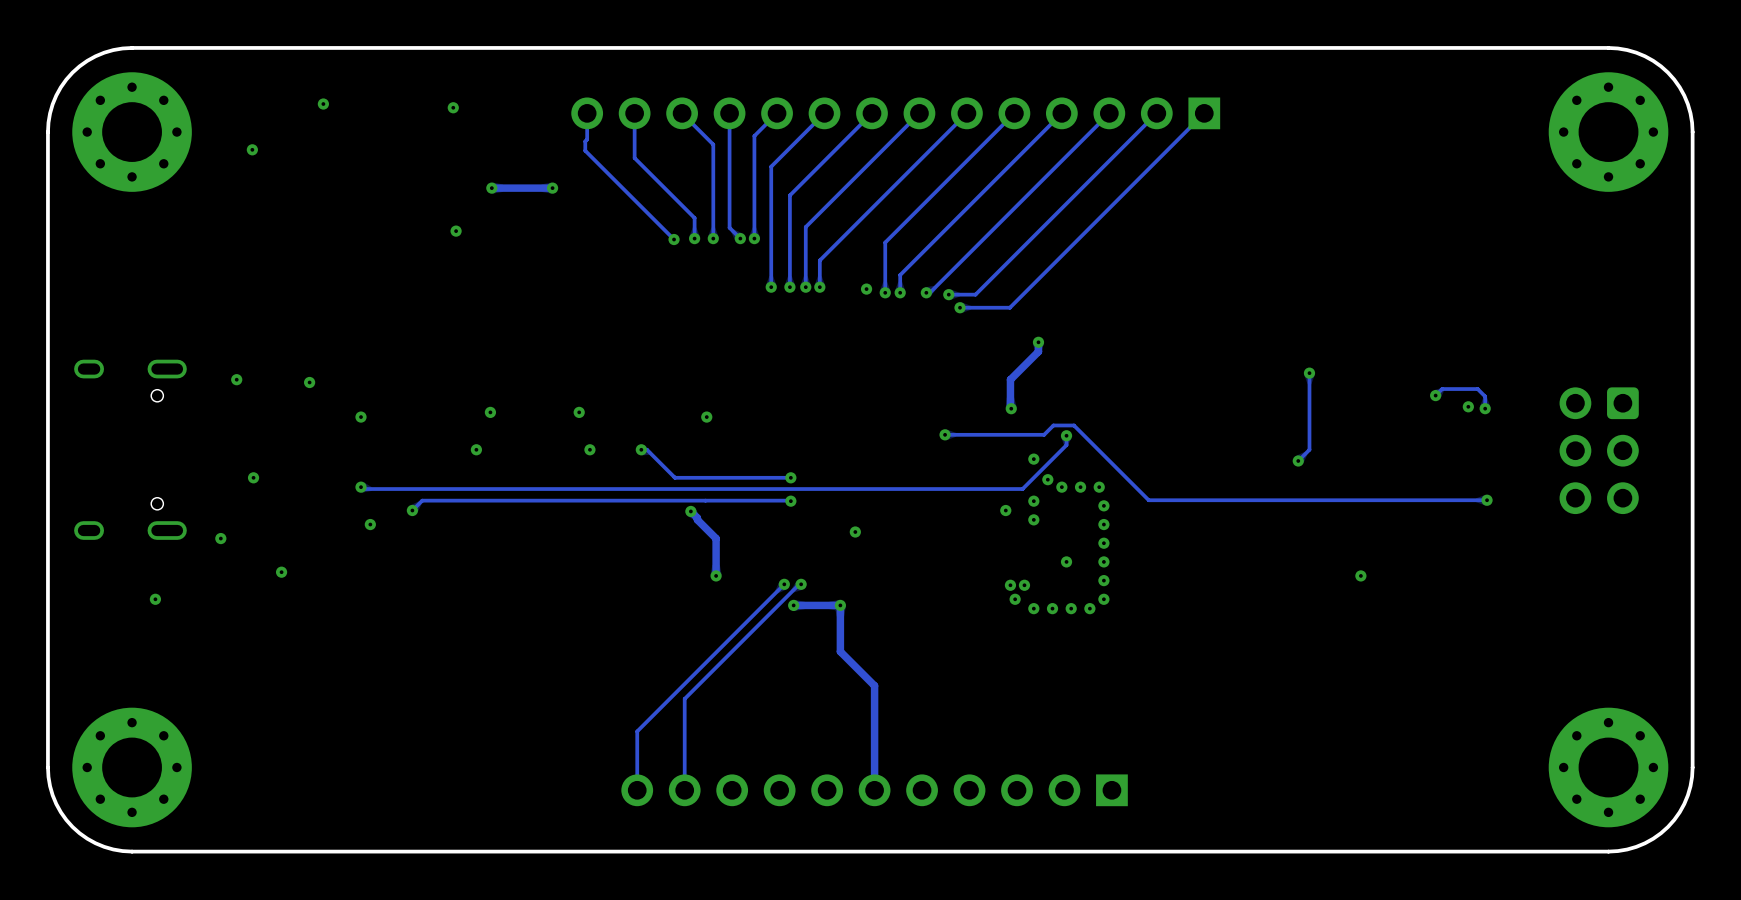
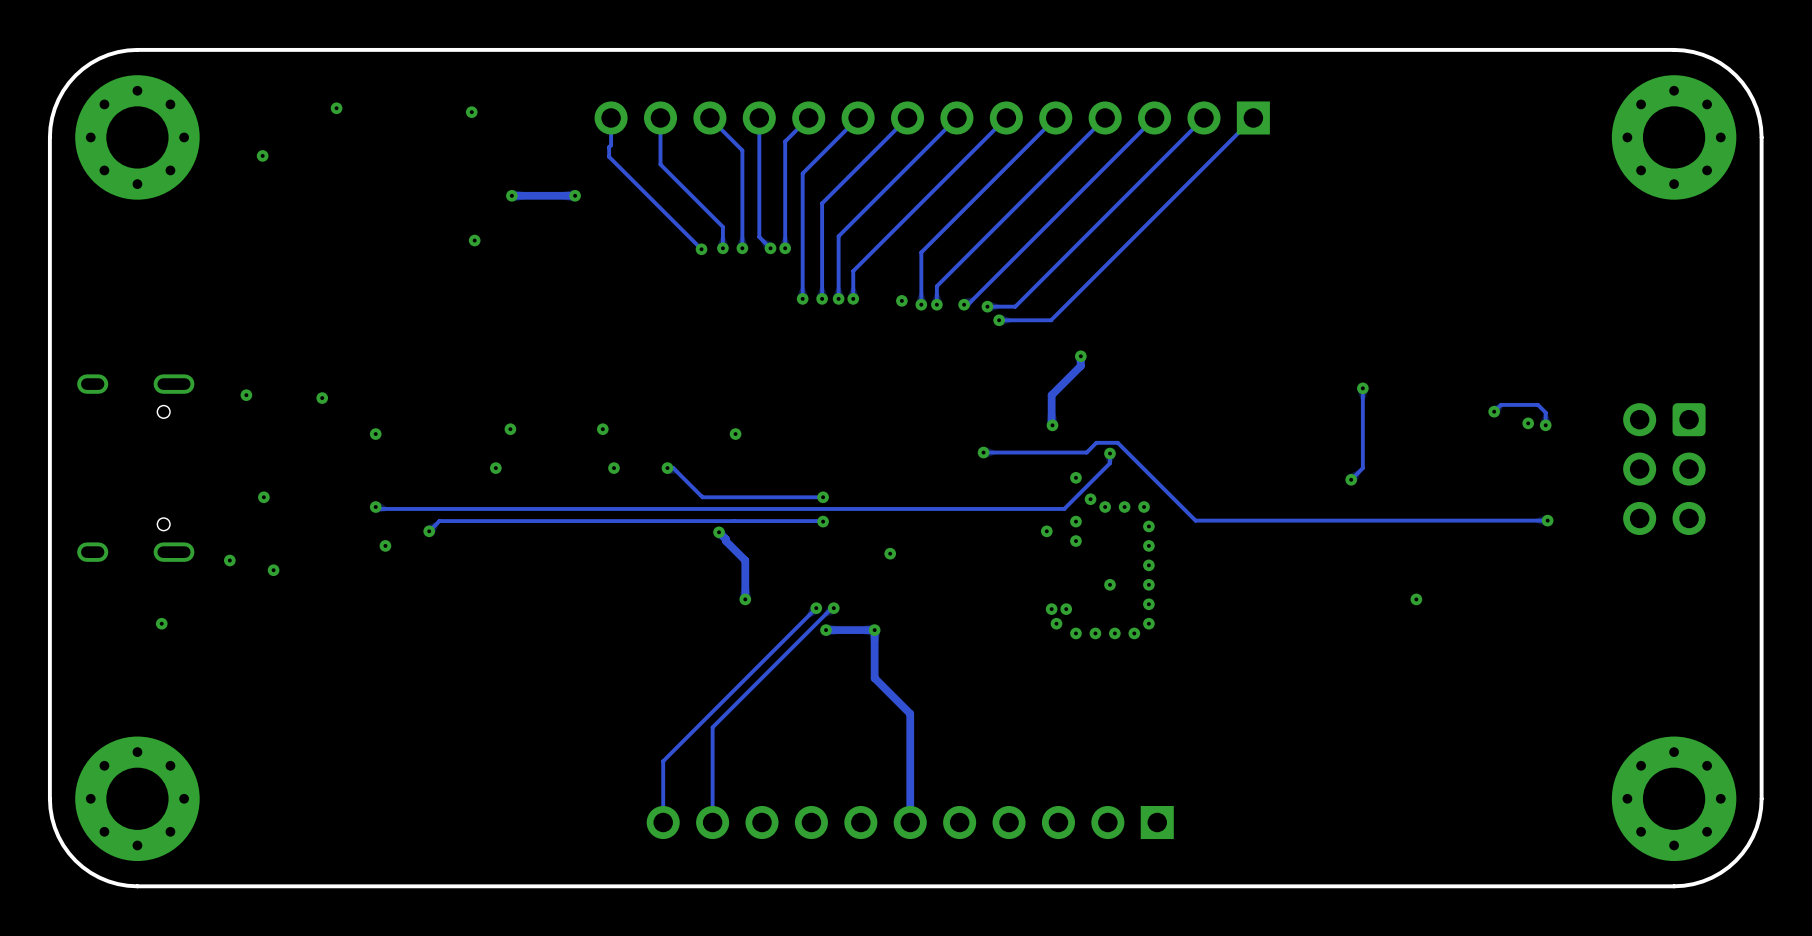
via position: (281, 572) -> (273, 570)

